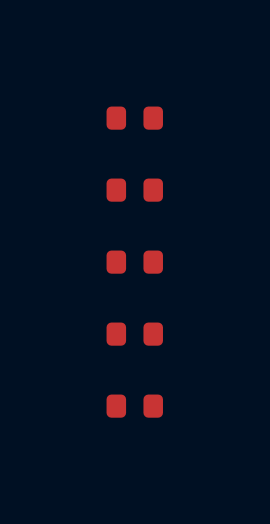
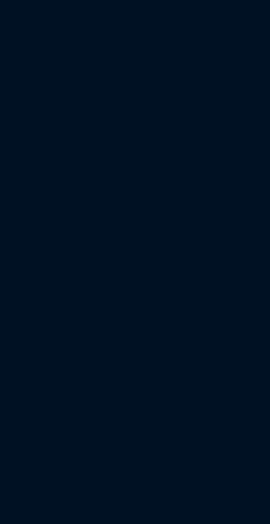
part: (134, 118) -> none
part: (134, 190) -> none
part: (134, 262) -> none
part: (134, 334) -> none
part: (134, 406) -> none

